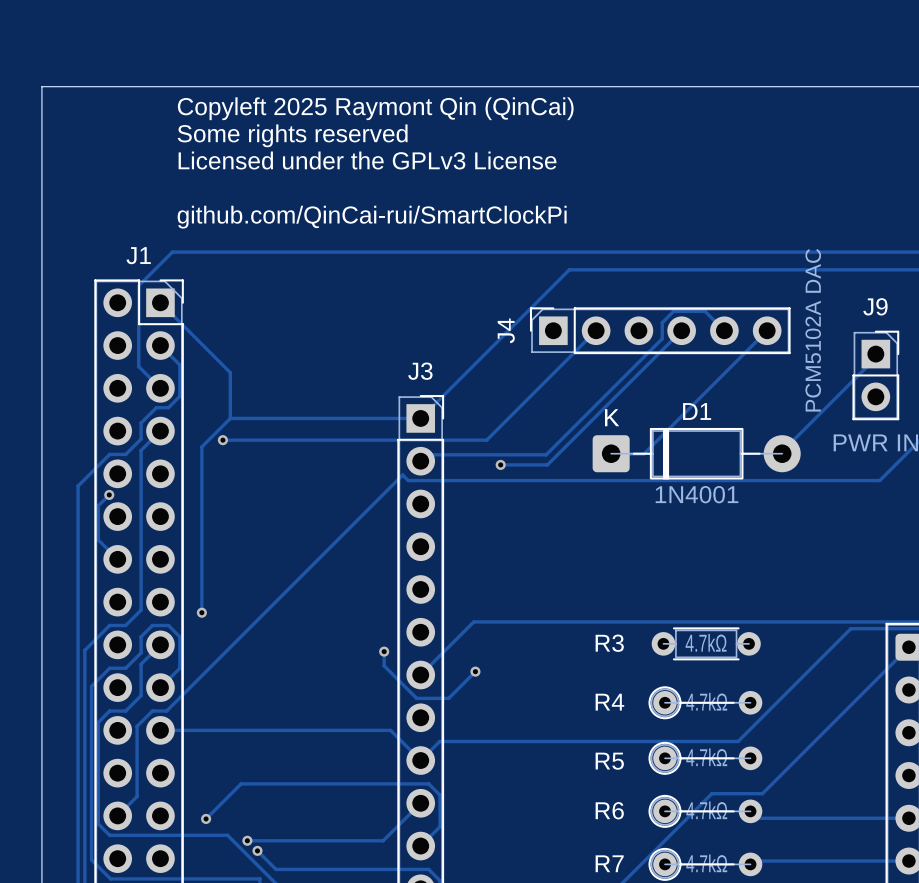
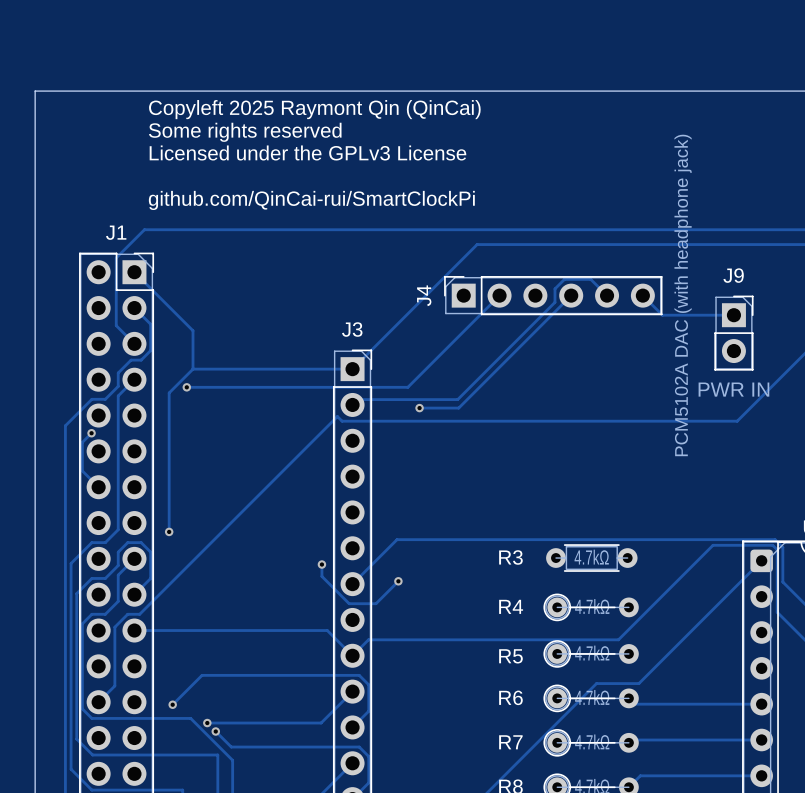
track: (767, 330) (643, 454) (608, 454) -> none
J4 value: PCM5102A DAC (813, 330) -> PCM5102A DAC (with headphone jack) (683, 295)
track: (875, 354) (875, 357) (779, 454) -> (733, 315) (662, 315) (642, 295)
D1: 1N4001 (696, 453) -> none

